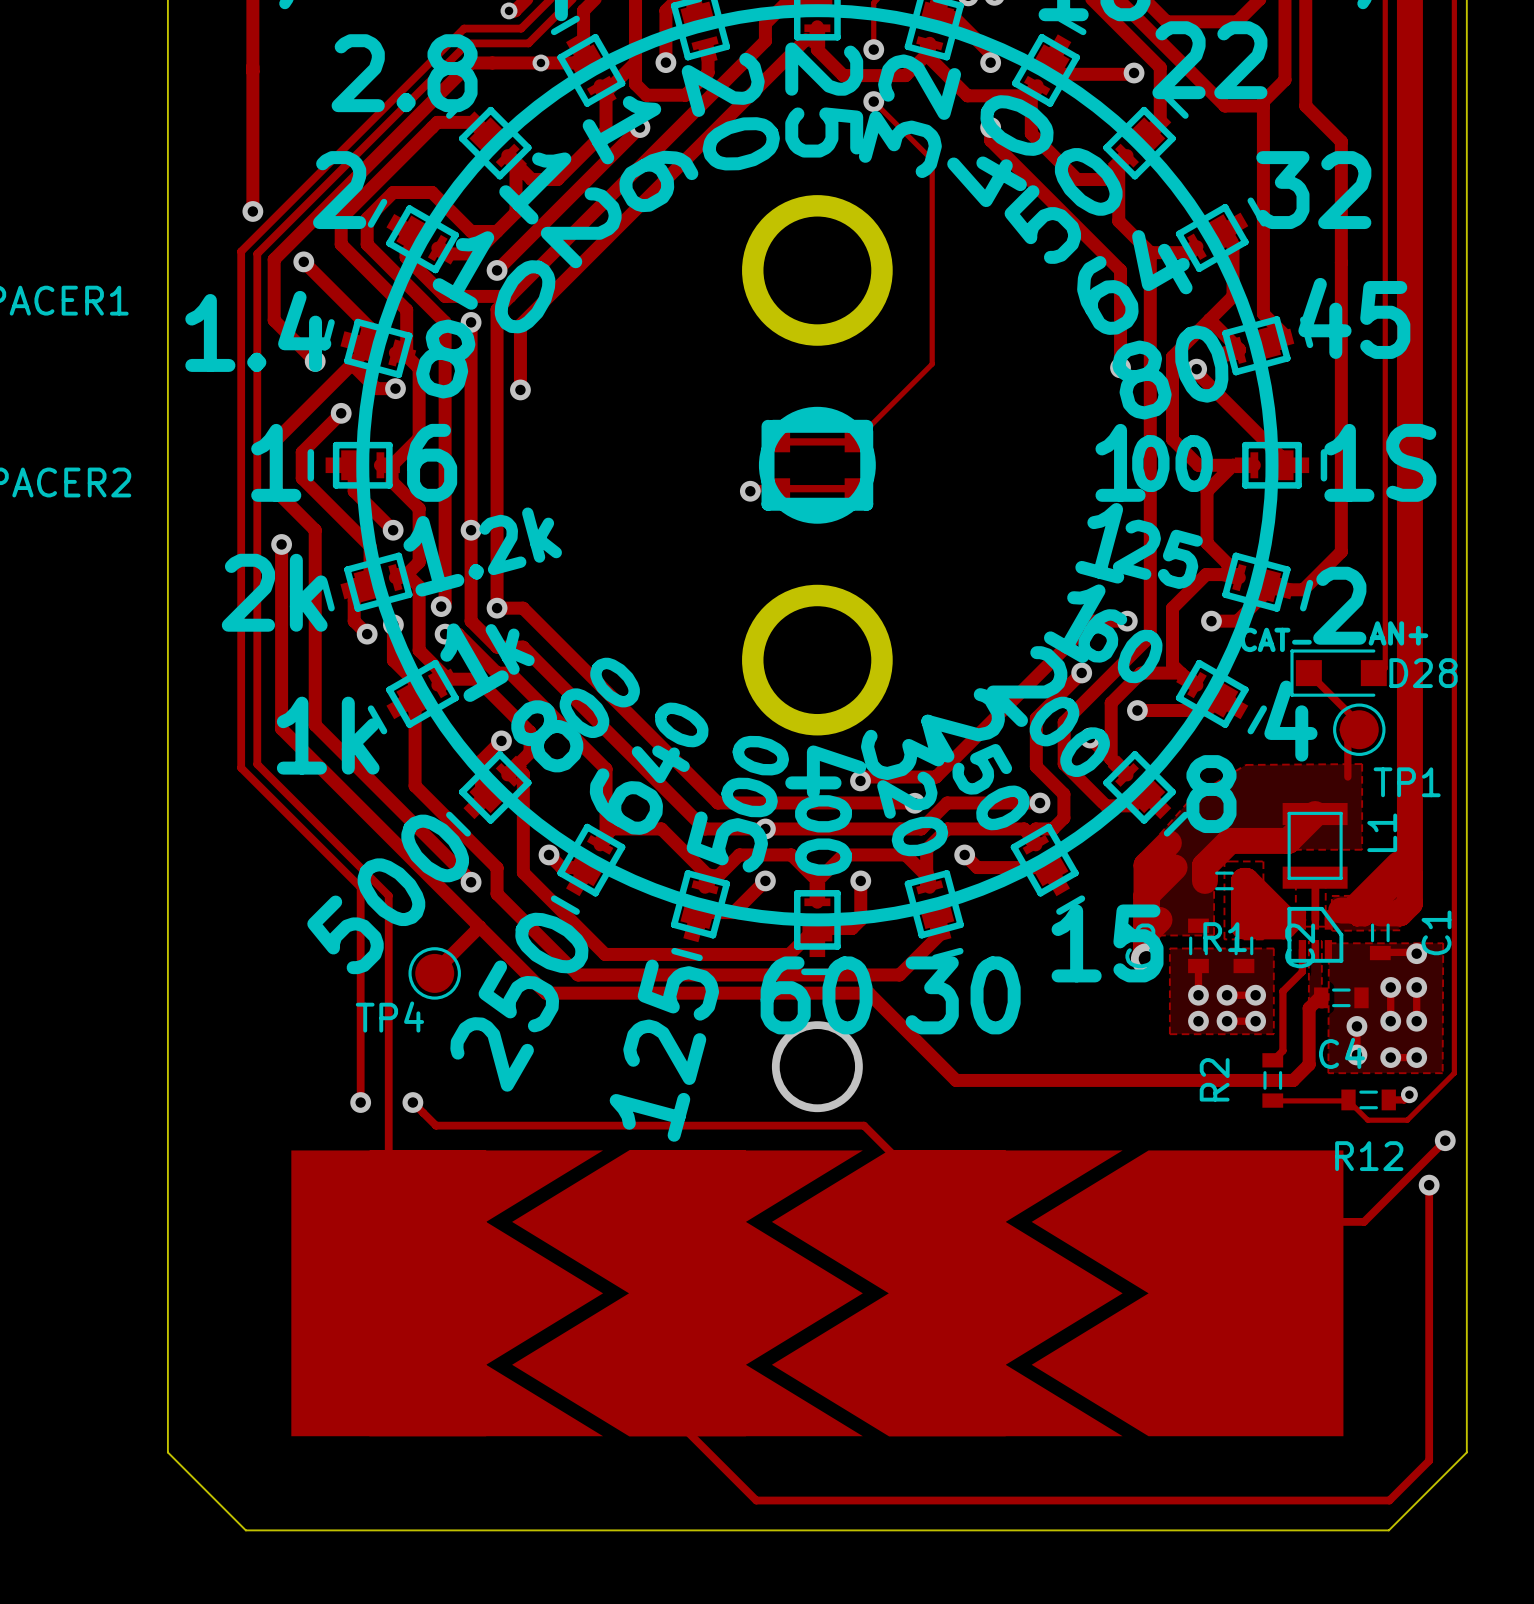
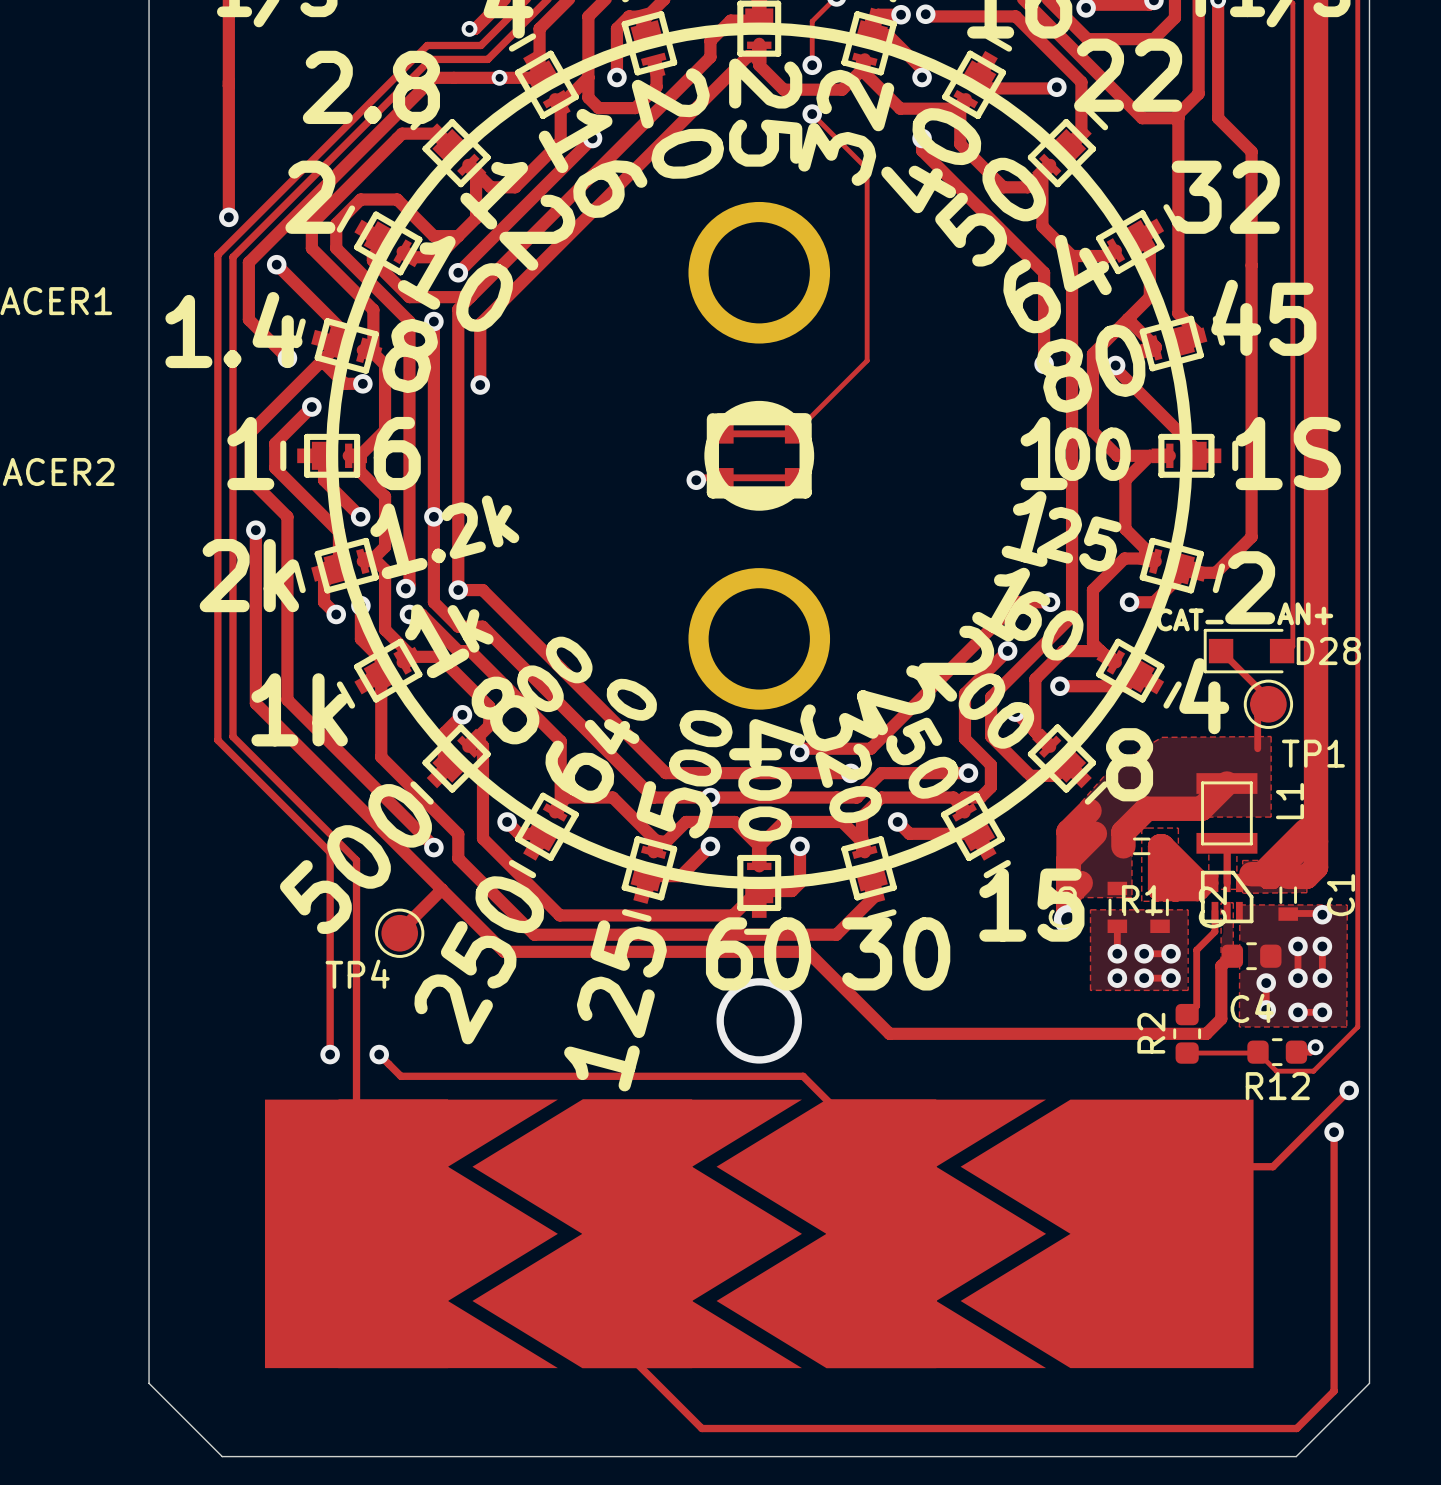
C4 footprint: [1314, 987, 1369, 1009] -> [1221, 942, 1282, 971]
R2 footprint: [1262, 1053, 1284, 1108] -> [1173, 1003, 1202, 1064]
R2 name position: R2 (1214, 1079) -> R2 (1151, 1033)
R12 footprint: [1341, 1089, 1396, 1111] -> [1247, 1038, 1308, 1067]
R12 name position: R12 (1369, 1156) -> R12 (1277, 1086)

